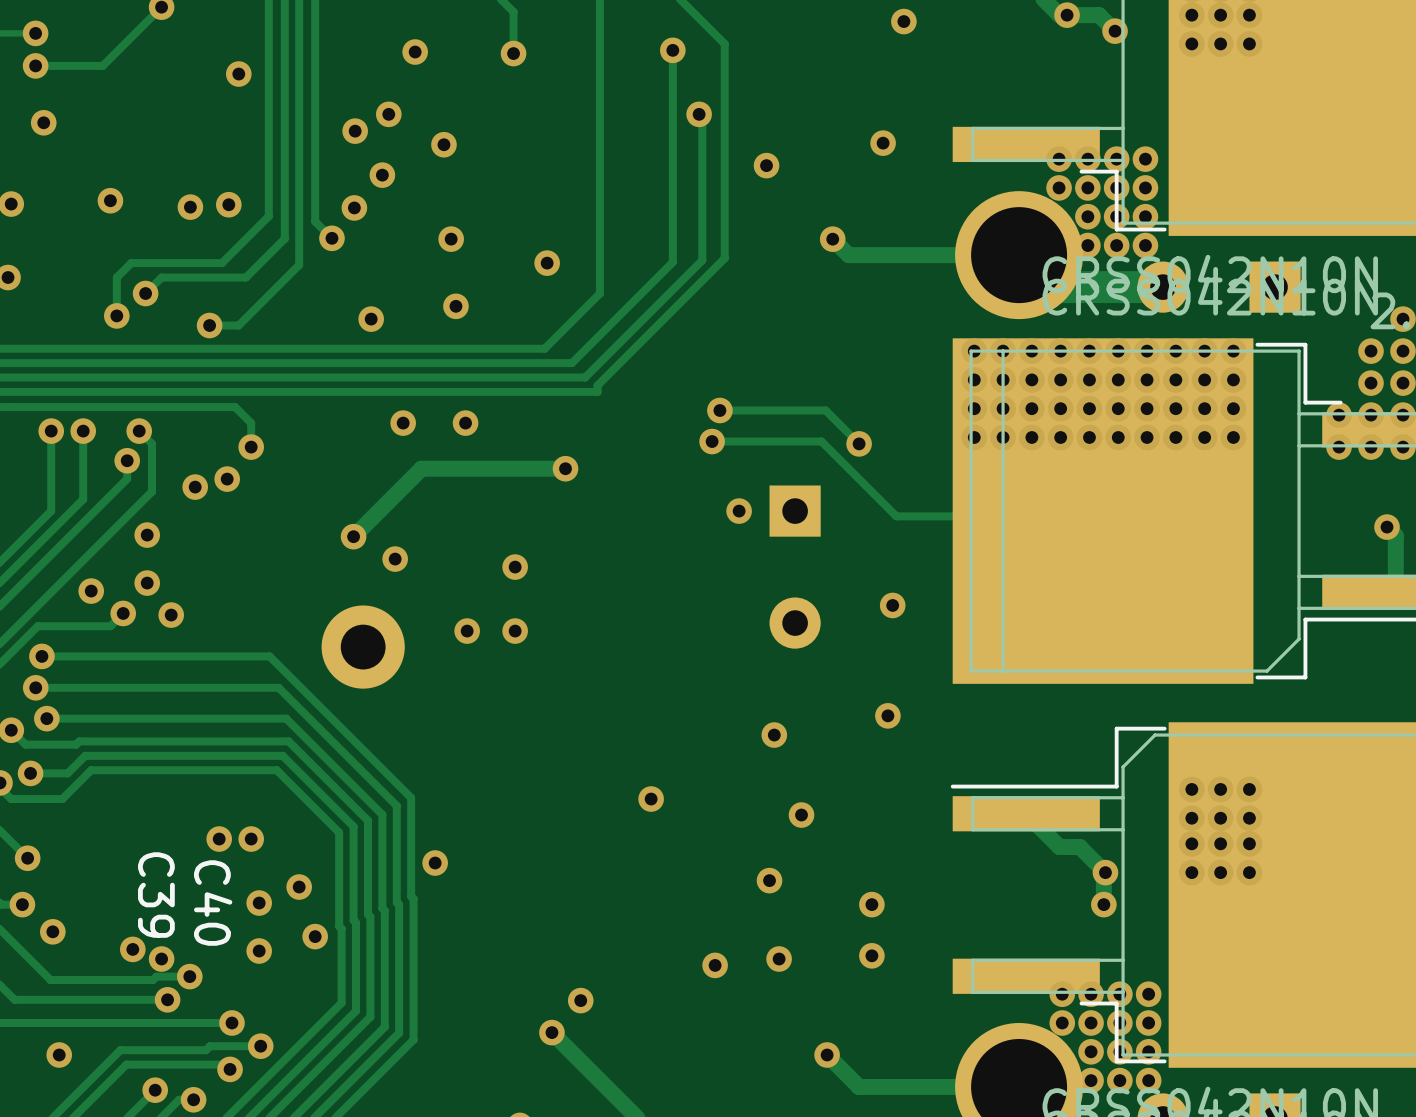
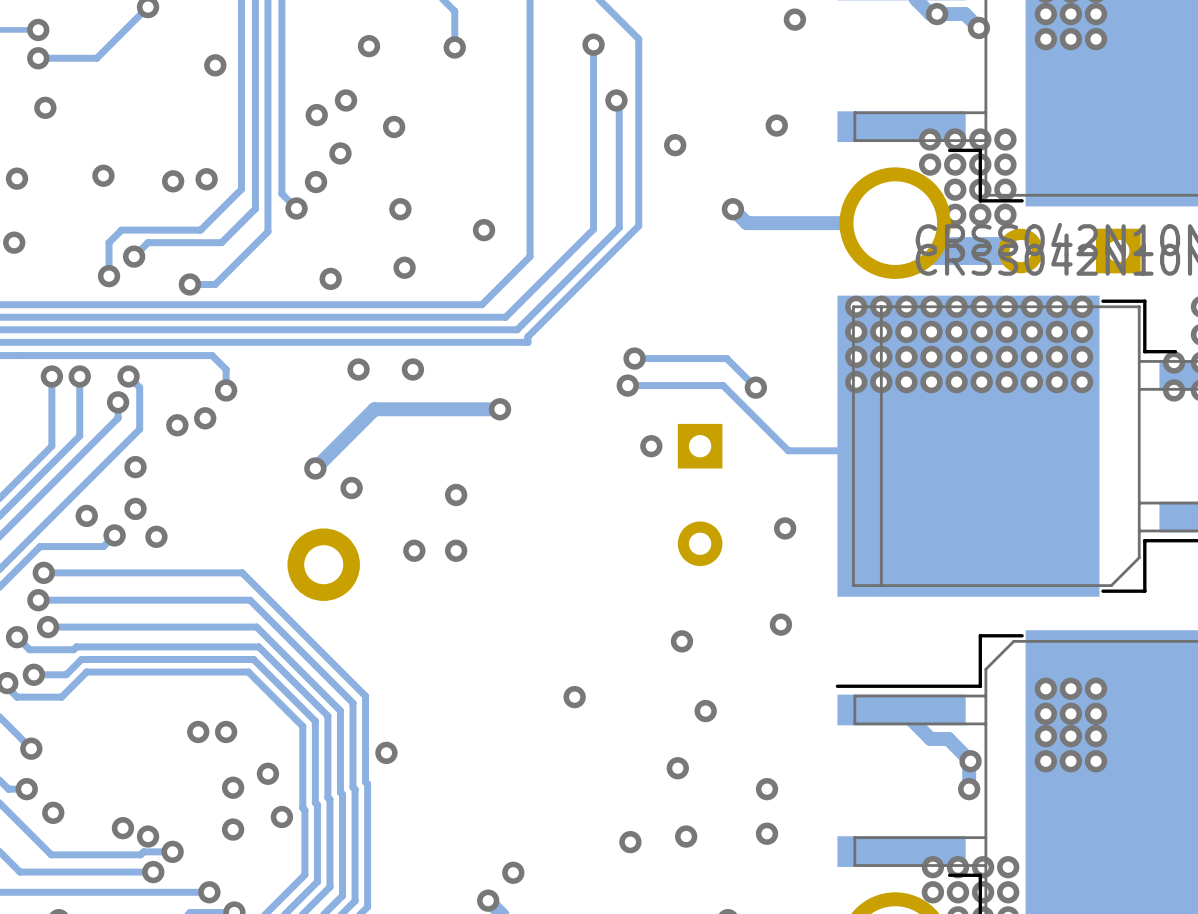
C39: (156, 895) -> none
C40: (213, 903) -> none

